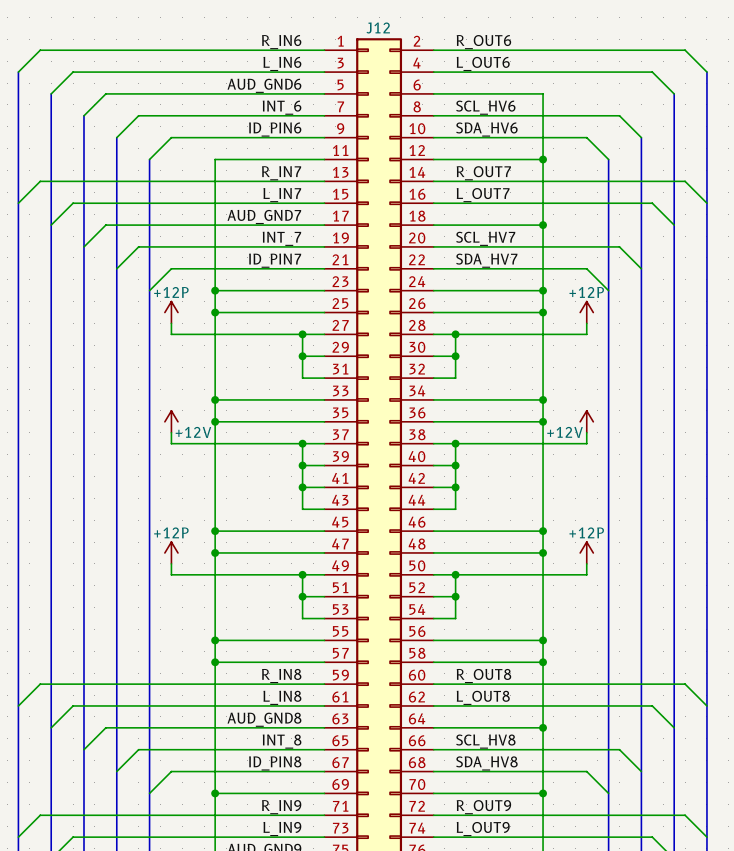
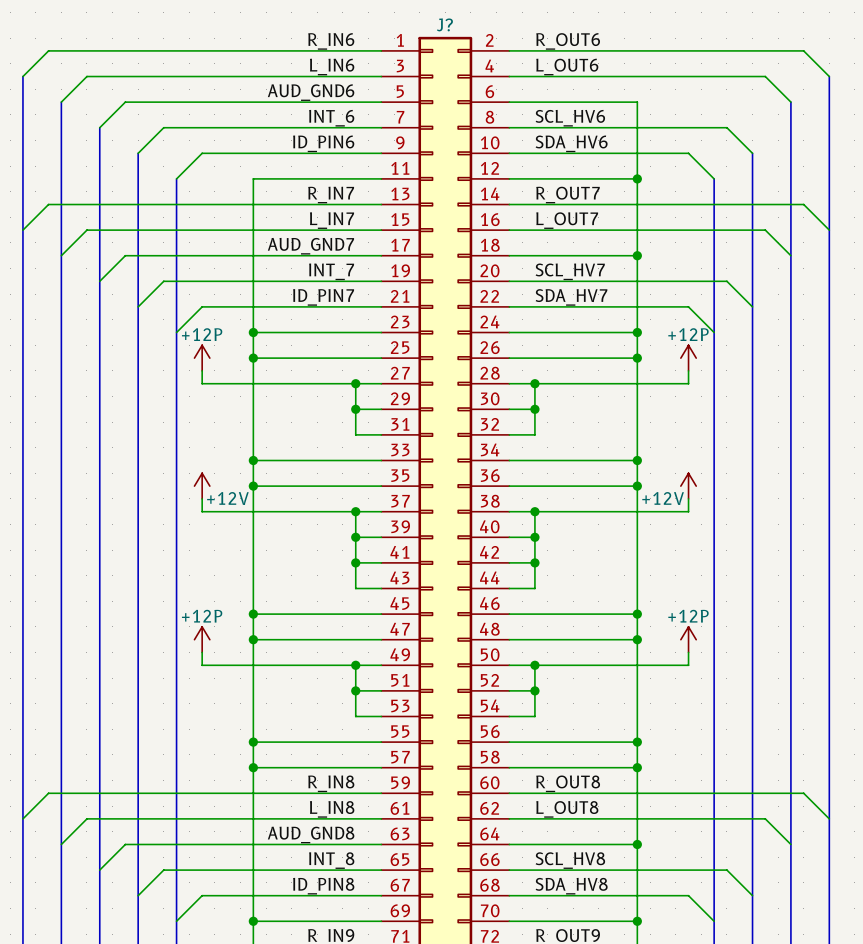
J12 name: J12 (378, 28) -> J? (444, 24)

